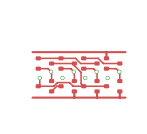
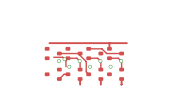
top track: (40, 52) (32, 52) -> none
top track: (38, 58) (75, 58) (80, 63) (97, 63) -> none
top track: none -> (53, 57) (62, 57) (65, 60) (65, 66)
top track: (38, 68) (48, 68) (51, 72) (51, 81) -> none
top track: (39, 77) (38, 86) (53, 86) (57, 82) (69, 82) (73, 86) (106, 86) -> none
via position: (39, 77) -> (64, 59)
top track: (125, 97) (32, 97) -> none

